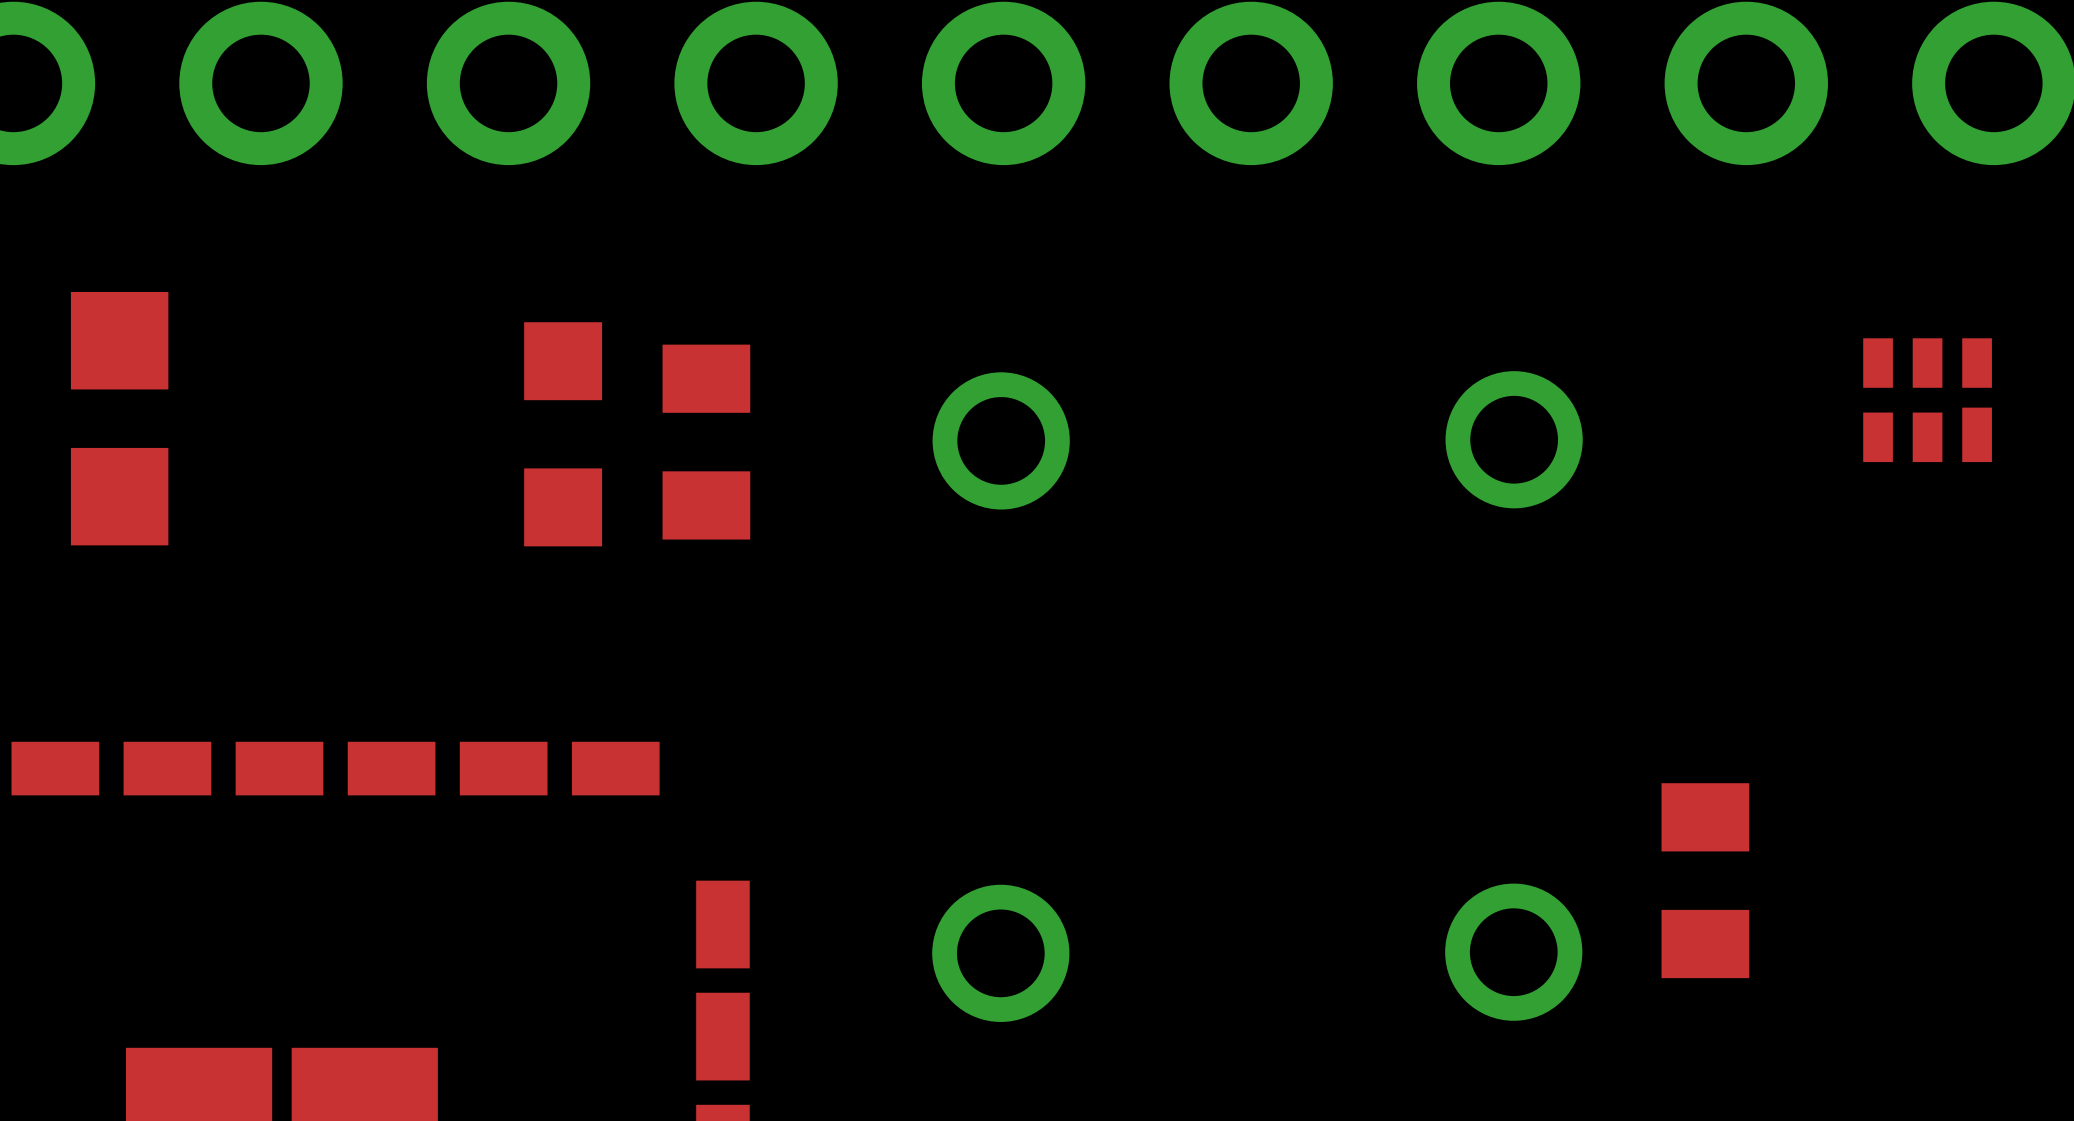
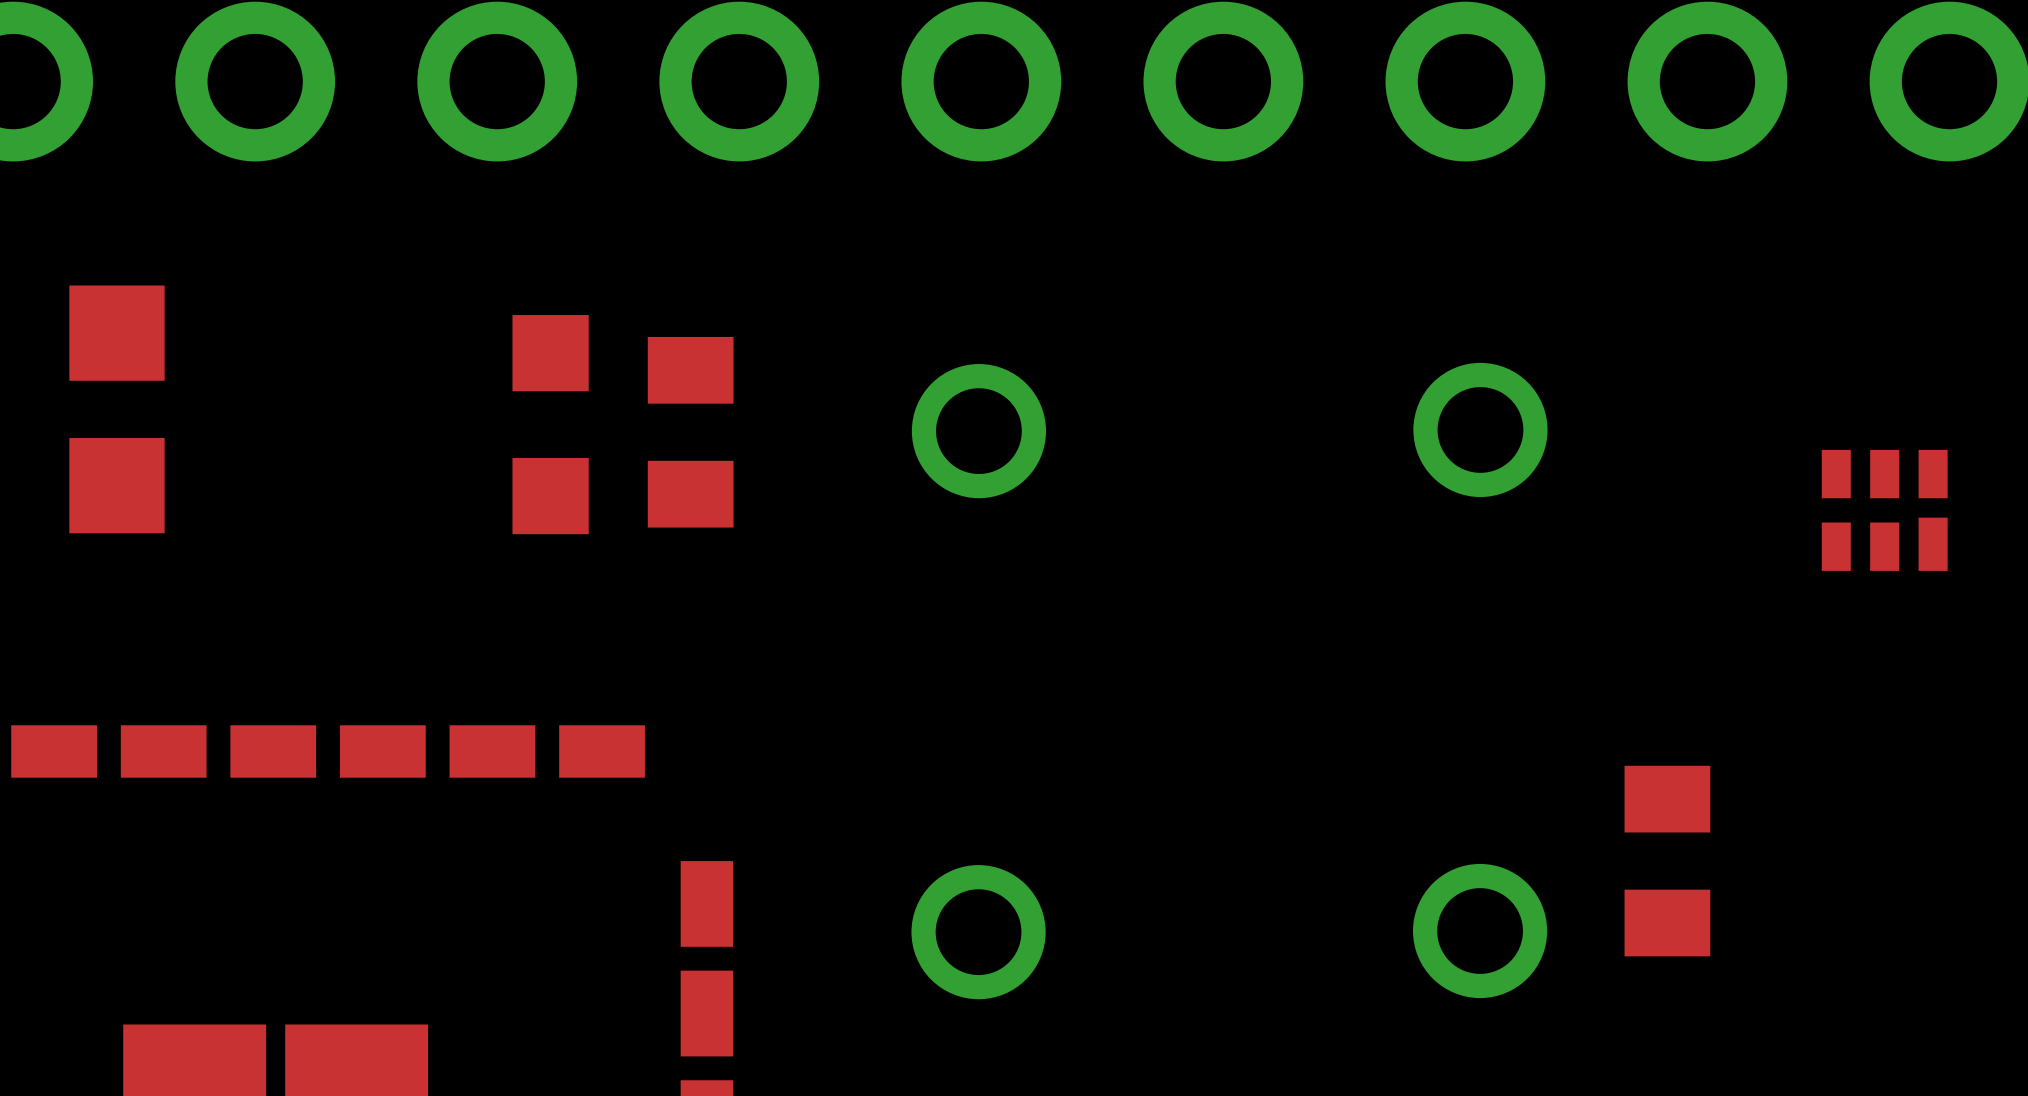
part position: (1927, 400) -> (1884, 510)

